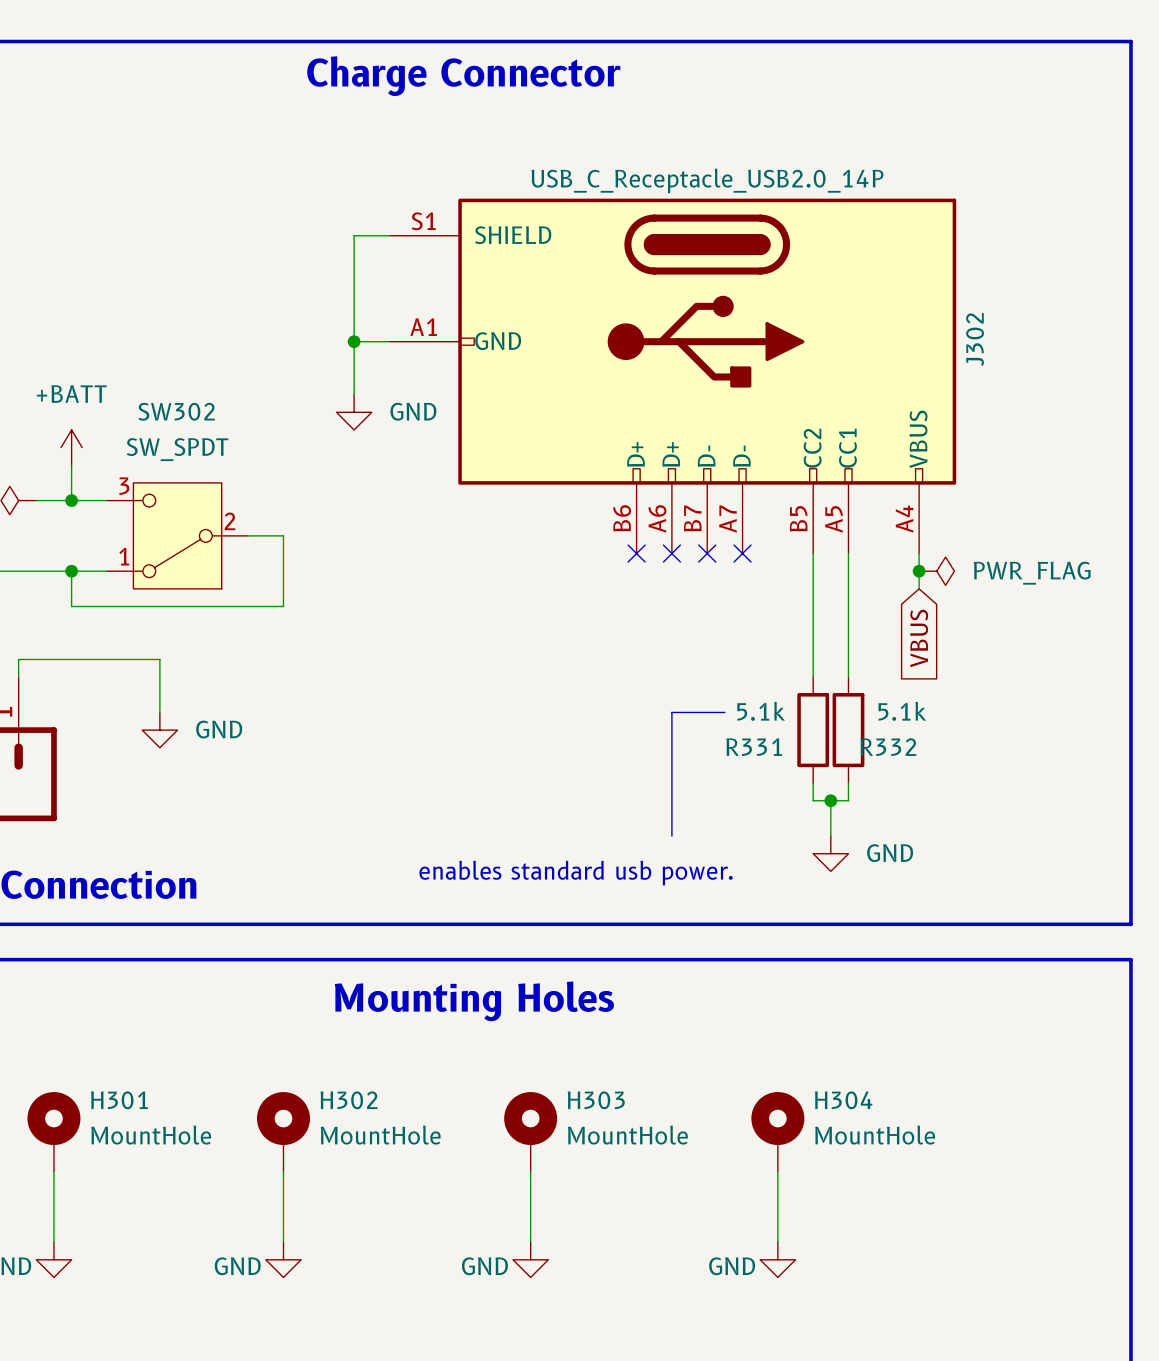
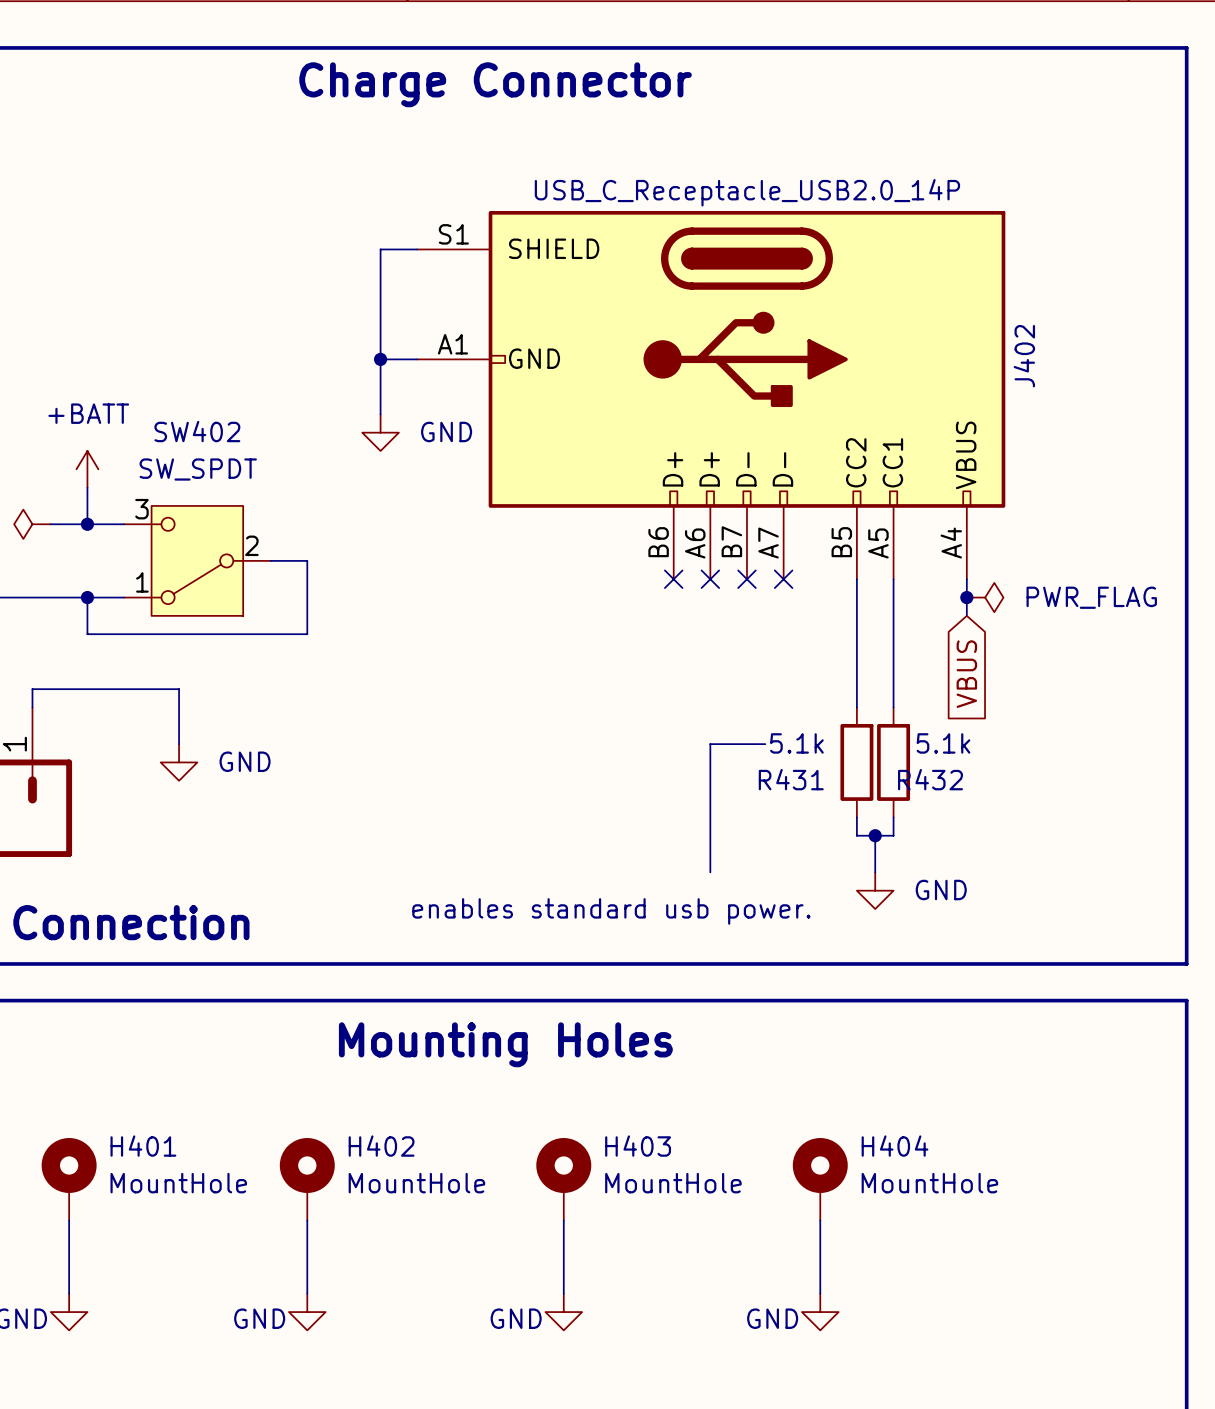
J302 name: J302 (975, 339) -> J402 (1024, 356)
SW302 name: SW302 (176, 411) -> SW402 (197, 431)
R331 name: R331 (754, 747) -> R431 (791, 779)
R332 name: R332 (888, 747) -> R432 (930, 779)
H301 name: H301 (119, 1100) -> H401 (143, 1146)
H302 name: H302 (349, 1100) -> H402 (381, 1146)
H303 name: H303 (596, 1100) -> H403 (638, 1146)
H304 name: H304 (843, 1100) -> H404 (895, 1146)

